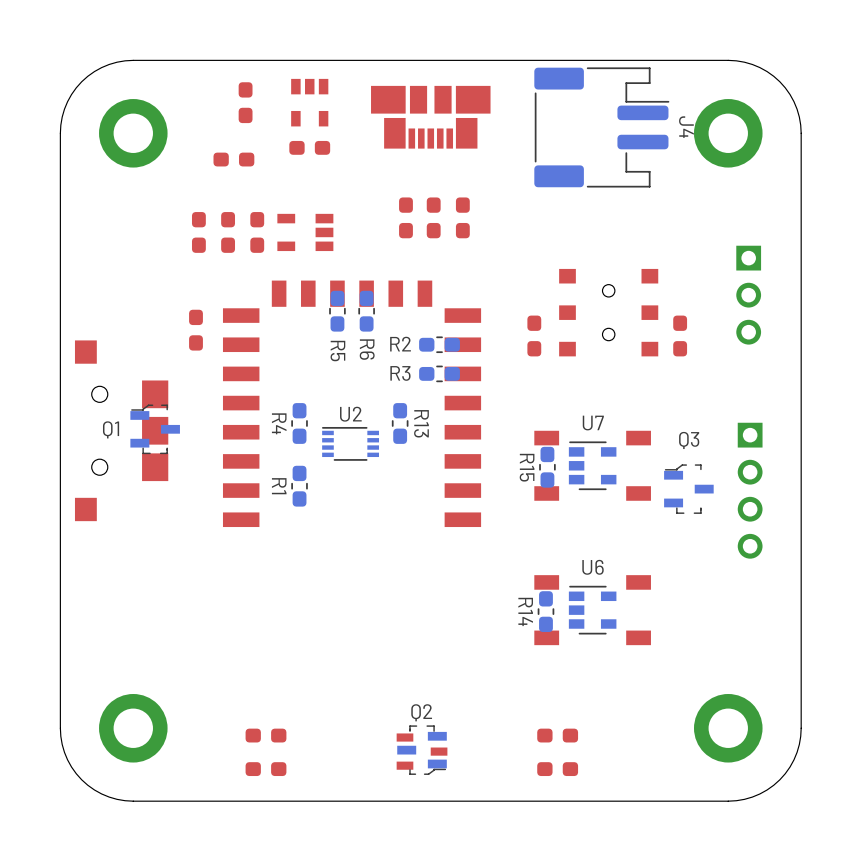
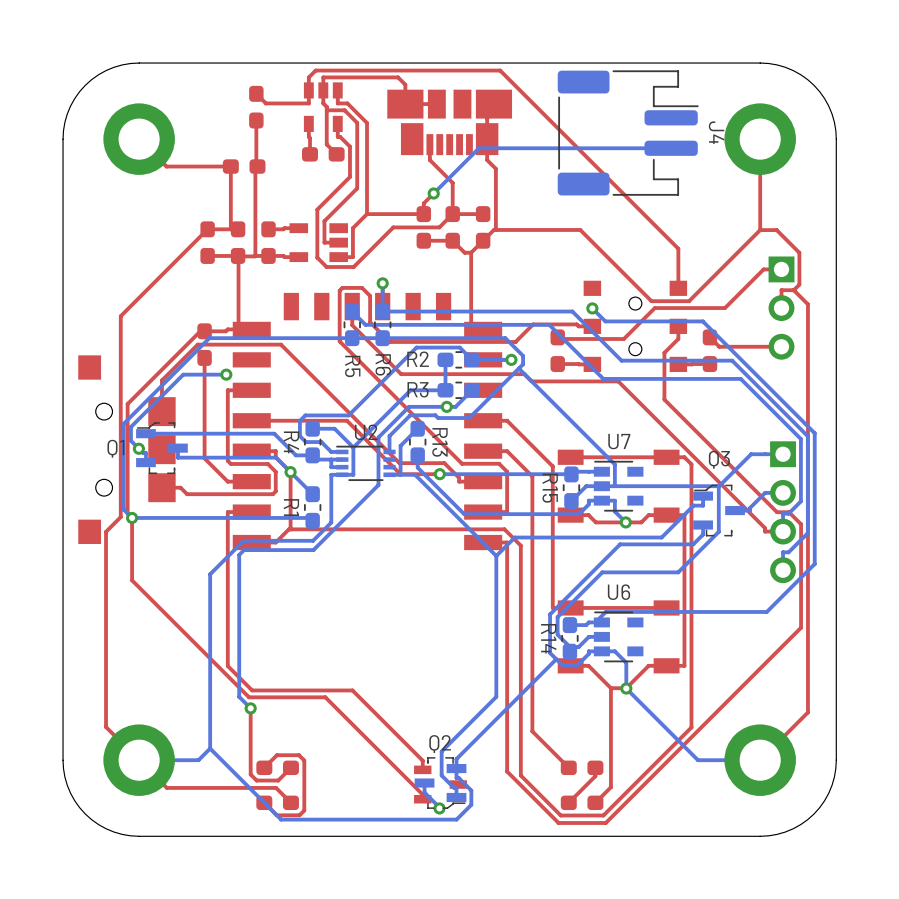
top track: none -> (337, 90) (337, 103) (347, 103) (367, 122) (367, 214)
top track: none -> (256, 93) (265, 103) (308, 103) (308, 77) (315, 70) (500, 70) (678, 248) (678, 288)
top track: none -> (493, 104) (493, 111) (487, 118) (487, 160) (495, 168) (495, 229)
top track: none -> (436, 108) (433, 108) (428, 104) (405, 104) (405, 84) (398, 77) (323, 77) (323, 103) (326, 106) (326, 144) (336, 154)
top track: none -> (326, 110) (344, 110) (357, 122) (357, 188) (324, 221) (324, 242) (338, 242)
top track: none -> (256, 120) (255, 255)
top track: none -> (308, 123) (310, 154)
top track: none -> (337, 123) (337, 136) (340, 136) (349, 146) (349, 176) (317, 209) (317, 257) (326, 267) (353, 267) (393, 227) (439, 227) (452, 214)
top track: none -> (139, 139) (166, 166) (230, 166) (230, 229)
top track: none -> (760, 139) (760, 230)
top track: none -> (429, 144) (429, 160) (452, 182) (452, 214)
bottom track: none -> (671, 148) (478, 148) (433, 193)
top track: none -> (433, 193) (423, 203) (423, 214) (367, 214)
via: none -> (433, 193)
top track: none -> (367, 214) (352, 228) (352, 257) (338, 257)
top track: none -> (483, 214) (452, 214)
top track: none -> (298, 228) (268, 229)
top track: none -> (238, 229) (207, 229) (120, 316) (120, 517) (106, 531) (106, 727) (166, 787) (276, 787) (290, 802)
top track: none -> (760, 230) (776, 230) (799, 252) (799, 284) (793, 290)
top track: none -> (760, 230) (689, 301) (651, 301) (580, 229) (493, 229) (471, 252)
top track: none -> (423, 240) (452, 240) (464, 252) (471, 252)
top track: none -> (471, 252) (471, 329) (483, 329)
top track: none -> (207, 255) (238, 256)
top track: none -> (238, 256) (238, 329)
top track: none -> (255, 255) (298, 257)
top track: none -> (255, 255) (238, 256)
top track: none -> (781, 269) (763, 269) (725, 308) (654, 308) (623, 338) (559, 338) (557, 337)
bottom track: none -> (382, 283) (382, 311) (572, 311) (621, 360) (732, 360) (807, 436) (807, 533) (788, 552) (783, 552) (783, 570)
via: none -> (382, 283)
top track: none -> (793, 290) (781, 290) (781, 308)
top track: none -> (793, 290) (807, 304) (807, 712) (760, 760)
top track: none -> (352, 306) (352, 325) (401, 374) (524, 374) (531, 381) (618, 381) (765, 528) (765, 531) (783, 531)
bottom track: none -> (592, 308) (605, 321) (702, 321) (814, 433) (814, 564) (766, 611) (605, 611) (595, 622)
via: none -> (592, 308)
bottom track: none -> (352, 311) (365, 324) (549, 324) (603, 378) (740, 378) (800, 439) (800, 501) (788, 513) (783, 513) (783, 531)
top track: none -> (592, 326) (533, 324) (515, 341) (389, 341) (370, 322) (370, 295) (362, 287) (342, 287) (339, 290) (339, 341) (462, 463) (499, 463) (507, 471) (507, 512) (483, 512)
top track: none -> (678, 326) (678, 338) (664, 352) (664, 399) (777, 512) (789, 512) (801, 524) (801, 627) (605, 822) (558, 822) (507, 771) (507, 542) (483, 542)
top track: none -> (251, 329) (200, 331) (127, 404) (127, 513) (132, 517) (132, 580) (249, 697) (325, 697) (422, 794) (422, 799)
top track: none -> (709, 337) (719, 346) (781, 346)
top track: none -> (204, 357) (204, 458) (227, 481) (251, 481)
bottom track: none -> (445, 359) (445, 390) (410, 390) (353, 447)
bottom track: none -> (511, 359) (472, 359) (459, 347) (416, 347) (348, 415) (305, 415) (299, 420) (299, 436) (305, 442) (321, 442) (331, 451) (342, 451)
via: none -> (511, 359)
top track: none -> (557, 364) (592, 364)
top track: none -> (709, 364) (678, 364)
bottom track: none -> (518, 368) (614, 464) (614, 486)
bottom track: none -> (226, 374) (183, 374) (130, 426) (130, 440) (143, 453) (145, 453) (145, 462)
via: none -> (226, 374)
top track: none -> (251, 390) (227, 390) (227, 460) (230, 463) (267, 463) (275, 471) (275, 491) (272, 494) (187, 494) (180, 487) (161, 487)
bottom track: none -> (472, 390) (455, 406) (409, 406) (378, 437) (378, 485) (313, 550) (244, 550) (239, 554) (239, 696) (250, 708)
via: none -> (446, 406)
top track: none -> (161, 411) (161, 380) (197, 344) (280, 344) (399, 463) (444, 463) (459, 477) (459, 481) (483, 481)
top track: none -> (251, 420) (346, 420) (400, 474) (439, 474)
top track: none -> (483, 420) (507, 420) (552, 466) (552, 607) (666, 607)
bottom track: none -> (312, 428) (334, 428) (353, 447)
bottom track: none -> (417, 428) (400, 445) (400, 474)
bottom track: none -> (145, 433) (274, 433) (296, 455) (312, 455) (316, 459) (342, 459)
bottom track: none -> (353, 447) (353, 474) (331, 474) (331, 522) (313, 540) (243, 540) (210, 574) (210, 748)
via: none -> (138, 448)
bottom track: none -> (177, 448) (177, 457) (276, 457) (312, 494)
top track: none -> (251, 451) (275, 451) (275, 457) (290, 472) (290, 529)
bottom track: none -> (389, 451) (389, 436) (410, 415) (469, 418) (523, 364) (523, 355) (505, 338) (209, 338) (123, 423) (123, 509) (132, 517) (309, 517) (312, 520)
top track: none -> (483, 451) (507, 451) (532, 476) (532, 731) (568, 767)
bottom track: none -> (783, 454) (751, 454) (718, 486)
bottom track: none -> (417, 455) (417, 467) (464, 514) (579, 514) (588, 504) (588, 500) (614, 500) (614, 511) (625, 522)
top track: none -> (570, 457) (684, 457) (691, 464) (691, 727) (603, 815) (560, 815) (520, 775) (520, 545) (504, 529) (288, 529) (275, 542) (251, 542)
bottom track: none -> (331, 459) (331, 467) (342, 467)
bottom track: none -> (601, 471) (573, 471) (571, 474) (439, 474)
via: none -> (290, 472)
bottom track: none -> (389, 474) (415, 474) (496, 555)
via: none -> (439, 474)
bottom track: none -> (718, 486) (718, 531) (678, 572) (602, 572) (557, 617) (557, 634) (569, 646)
bottom track: none -> (718, 486) (586, 486) (571, 501)
bottom track: none -> (783, 492) (765, 492) (749, 508) (749, 510) (735, 510)
bottom track: none -> (703, 496) (703, 505) (693, 505) (661, 537) (514, 537) (496, 555)
top track: none -> (251, 512) (227, 512) (227, 666) (252, 690) (352, 690) (422, 760) (422, 769)
top track: none -> (570, 515) (588, 515) (595, 522) (641, 522) (648, 515) (684, 515) (684, 665) (648, 665) (626, 688)
via: none -> (132, 517)
via: none -> (625, 522)
bottom track: none -> (703, 525) (703, 534) (693, 544) (620, 544) (550, 614) (550, 652) (562, 665) (577, 665) (588, 653) (588, 651) (614, 651) (626, 662) (626, 688) (697, 760) (760, 760)
bottom track: none -> (496, 555) (496, 696) (441, 751) (441, 775) (454, 787) (456, 787) (456, 797)
bottom track: none -> (601, 622) (569, 625)
bottom track: none -> (601, 636) (588, 636) (578, 646) (569, 646)
bottom track: none -> (556, 659) (456, 759) (456, 778) (458, 778) (471, 790) (471, 804) (456, 819) (281, 819) (210, 748)
top track: none -> (570, 665) (588, 665) (610, 688)
top track: none -> (610, 688) (610, 787) (595, 802)
top track: none -> (626, 688) (610, 688)
via: none -> (626, 688)
top track: none -> (250, 708) (250, 774) (256, 780) (278, 780) (290, 767)
via: none -> (250, 708)
bottom track: none -> (210, 748) (198, 760) (139, 760)
top track: none -> (264, 767) (276, 755) (298, 755) (304, 760) (304, 810) (299, 815) (276, 815) (264, 802)
top track: none -> (595, 767) (595, 776) (568, 802)
bottom track: none -> (424, 783) (424, 792) (439, 808)
via: none -> (439, 808)

